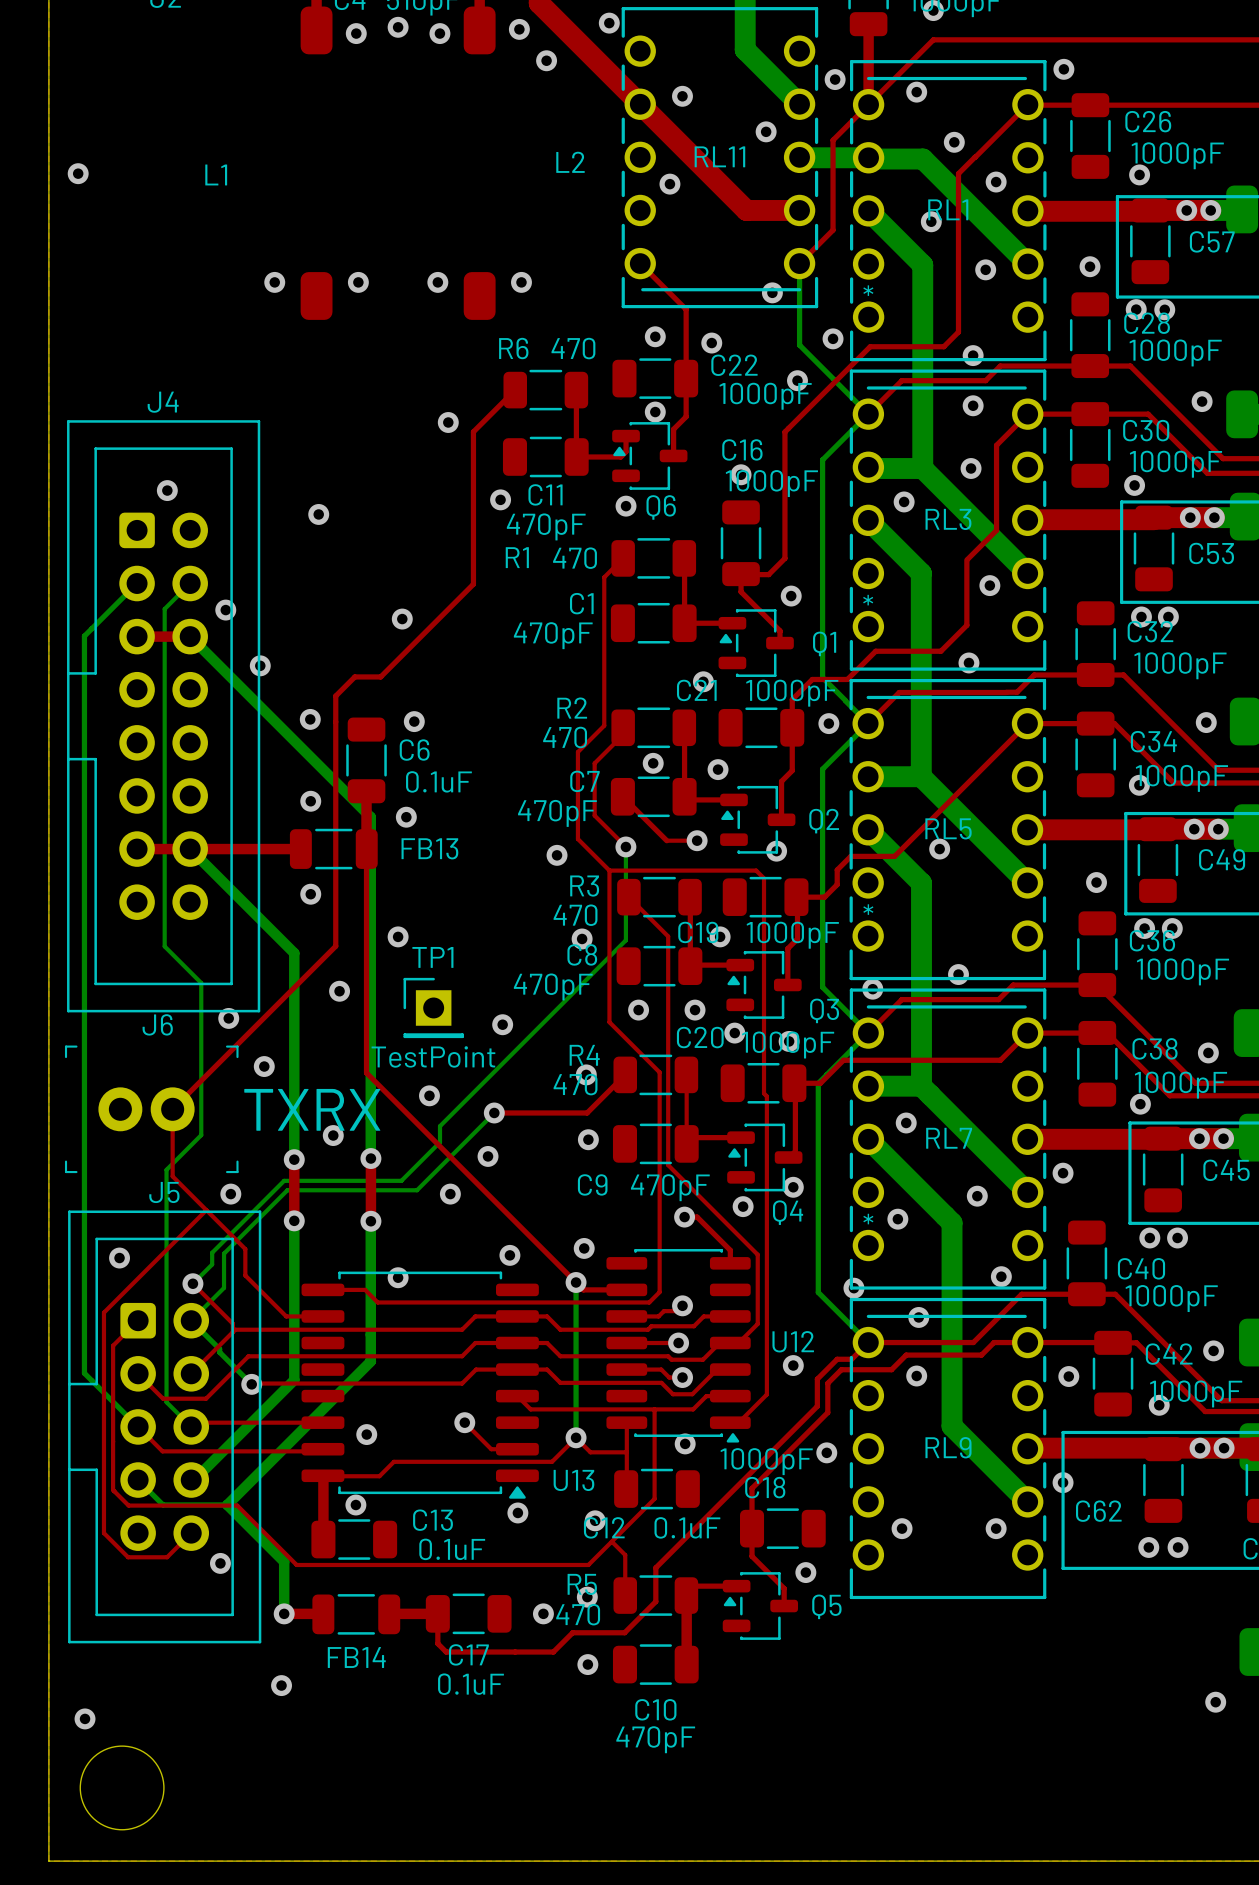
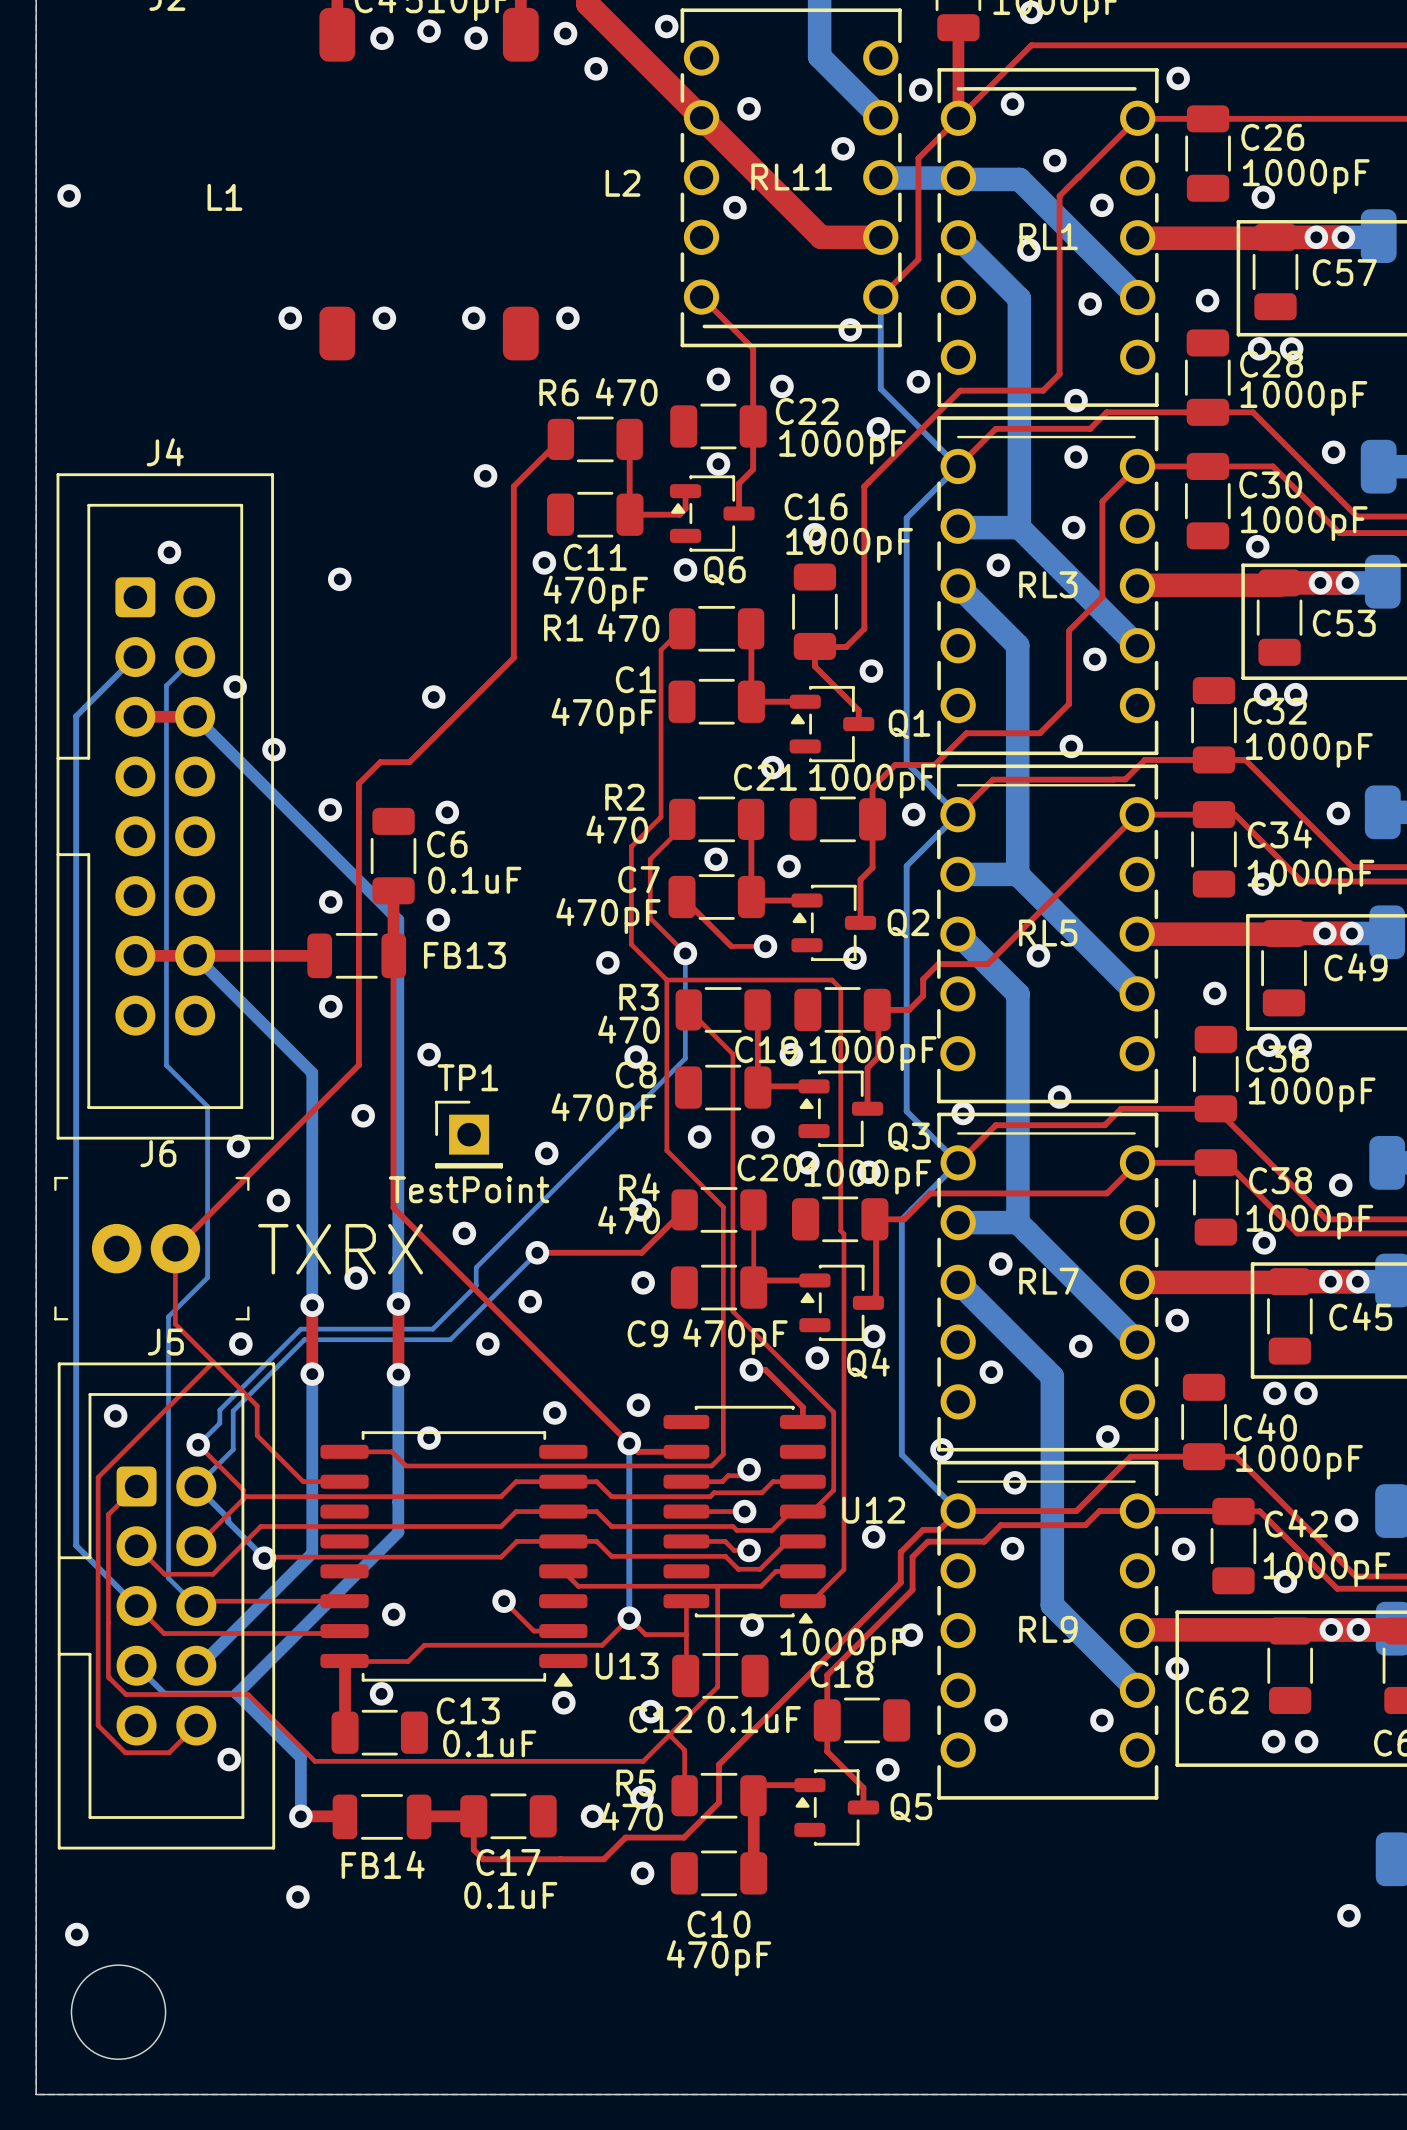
RL3 footprint: [849, 369, 1047, 671] -> [937, 416, 1159, 756]
RL5 footprint: [849, 678, 1047, 981] -> [937, 764, 1159, 1104]
RL7 footprint: [849, 988, 1047, 1290] -> [937, 1112, 1159, 1452]
RL9 footprint: [849, 1297, 1047, 1600] -> [937, 1460, 1159, 1800]

